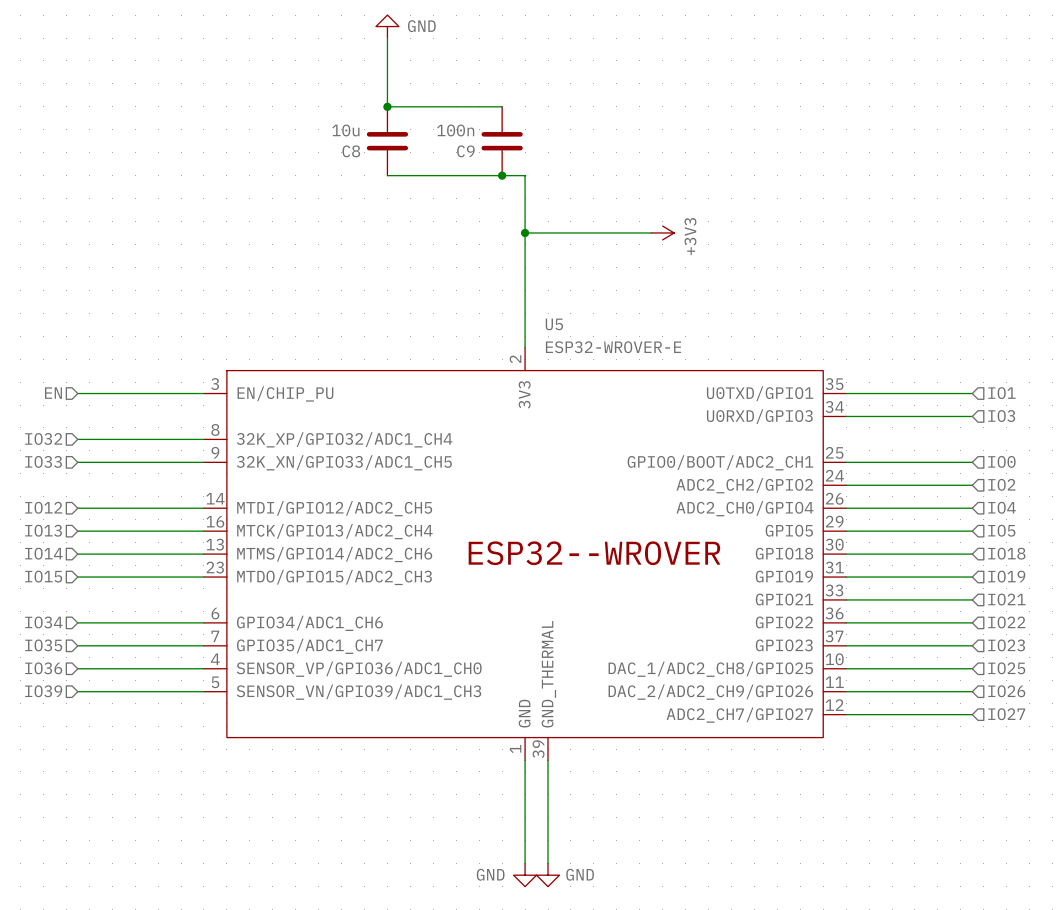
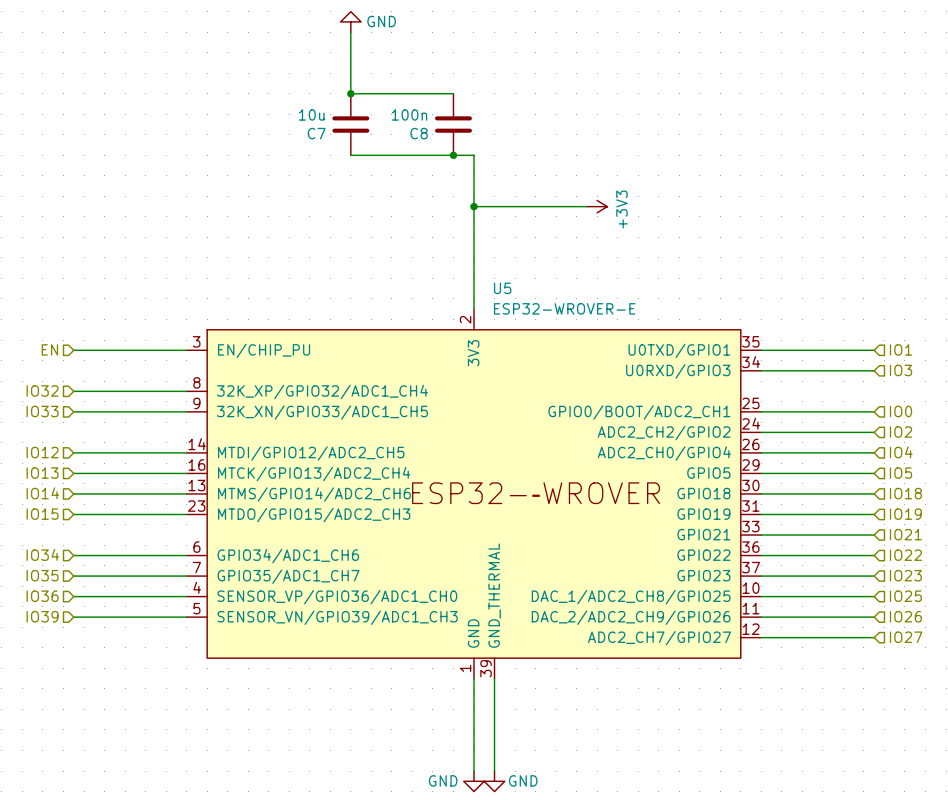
C8 name: C8 (351, 151) -> C7 (316, 133)
C9 name: C9 (465, 151) -> C8 (419, 133)

